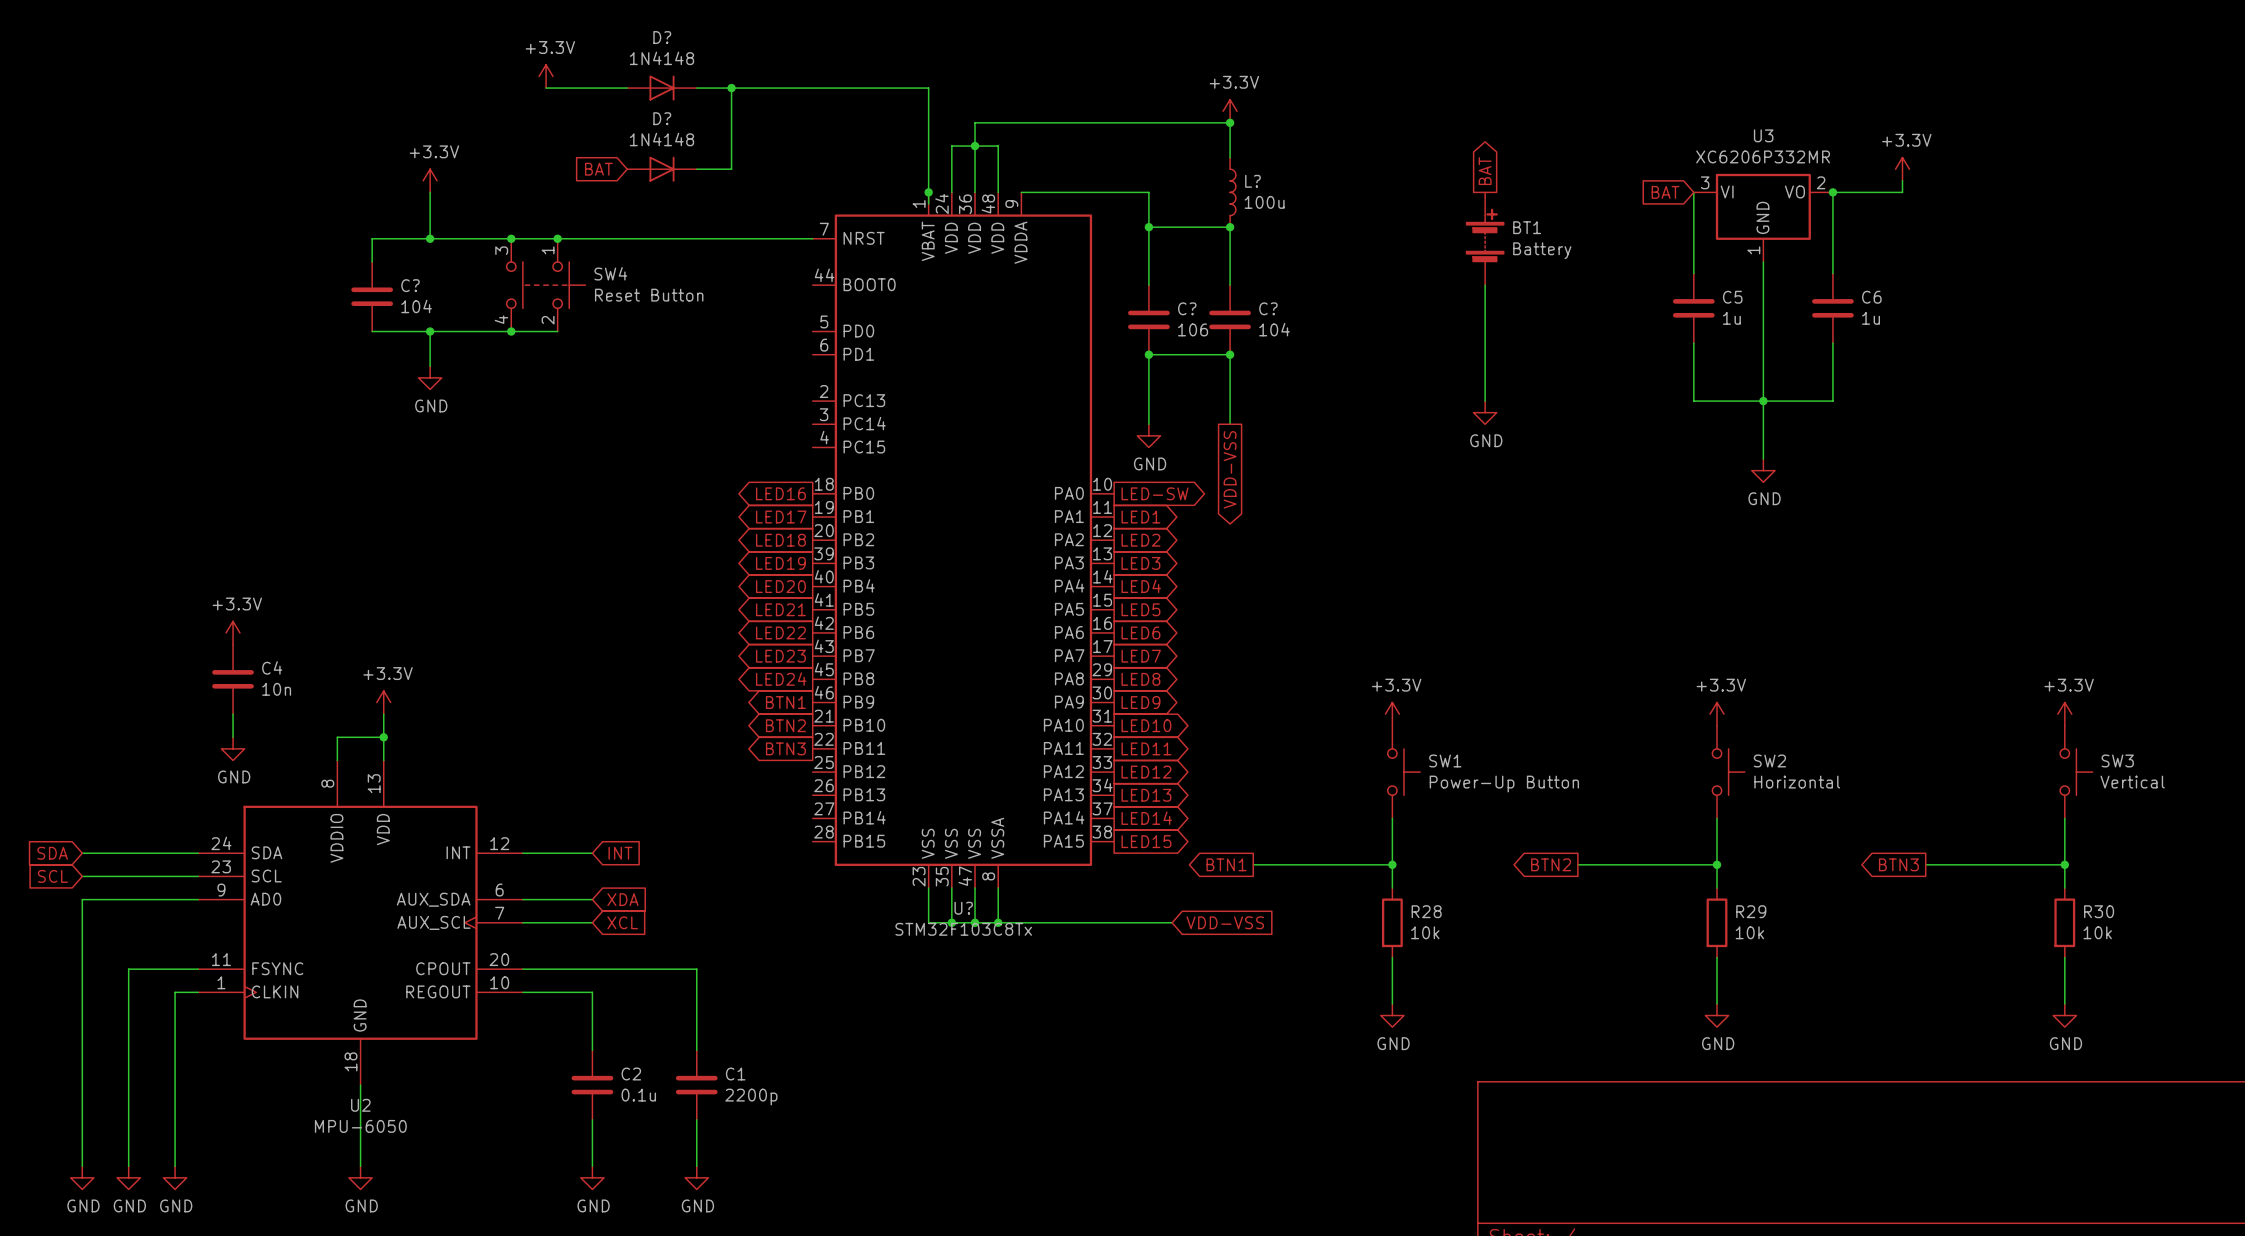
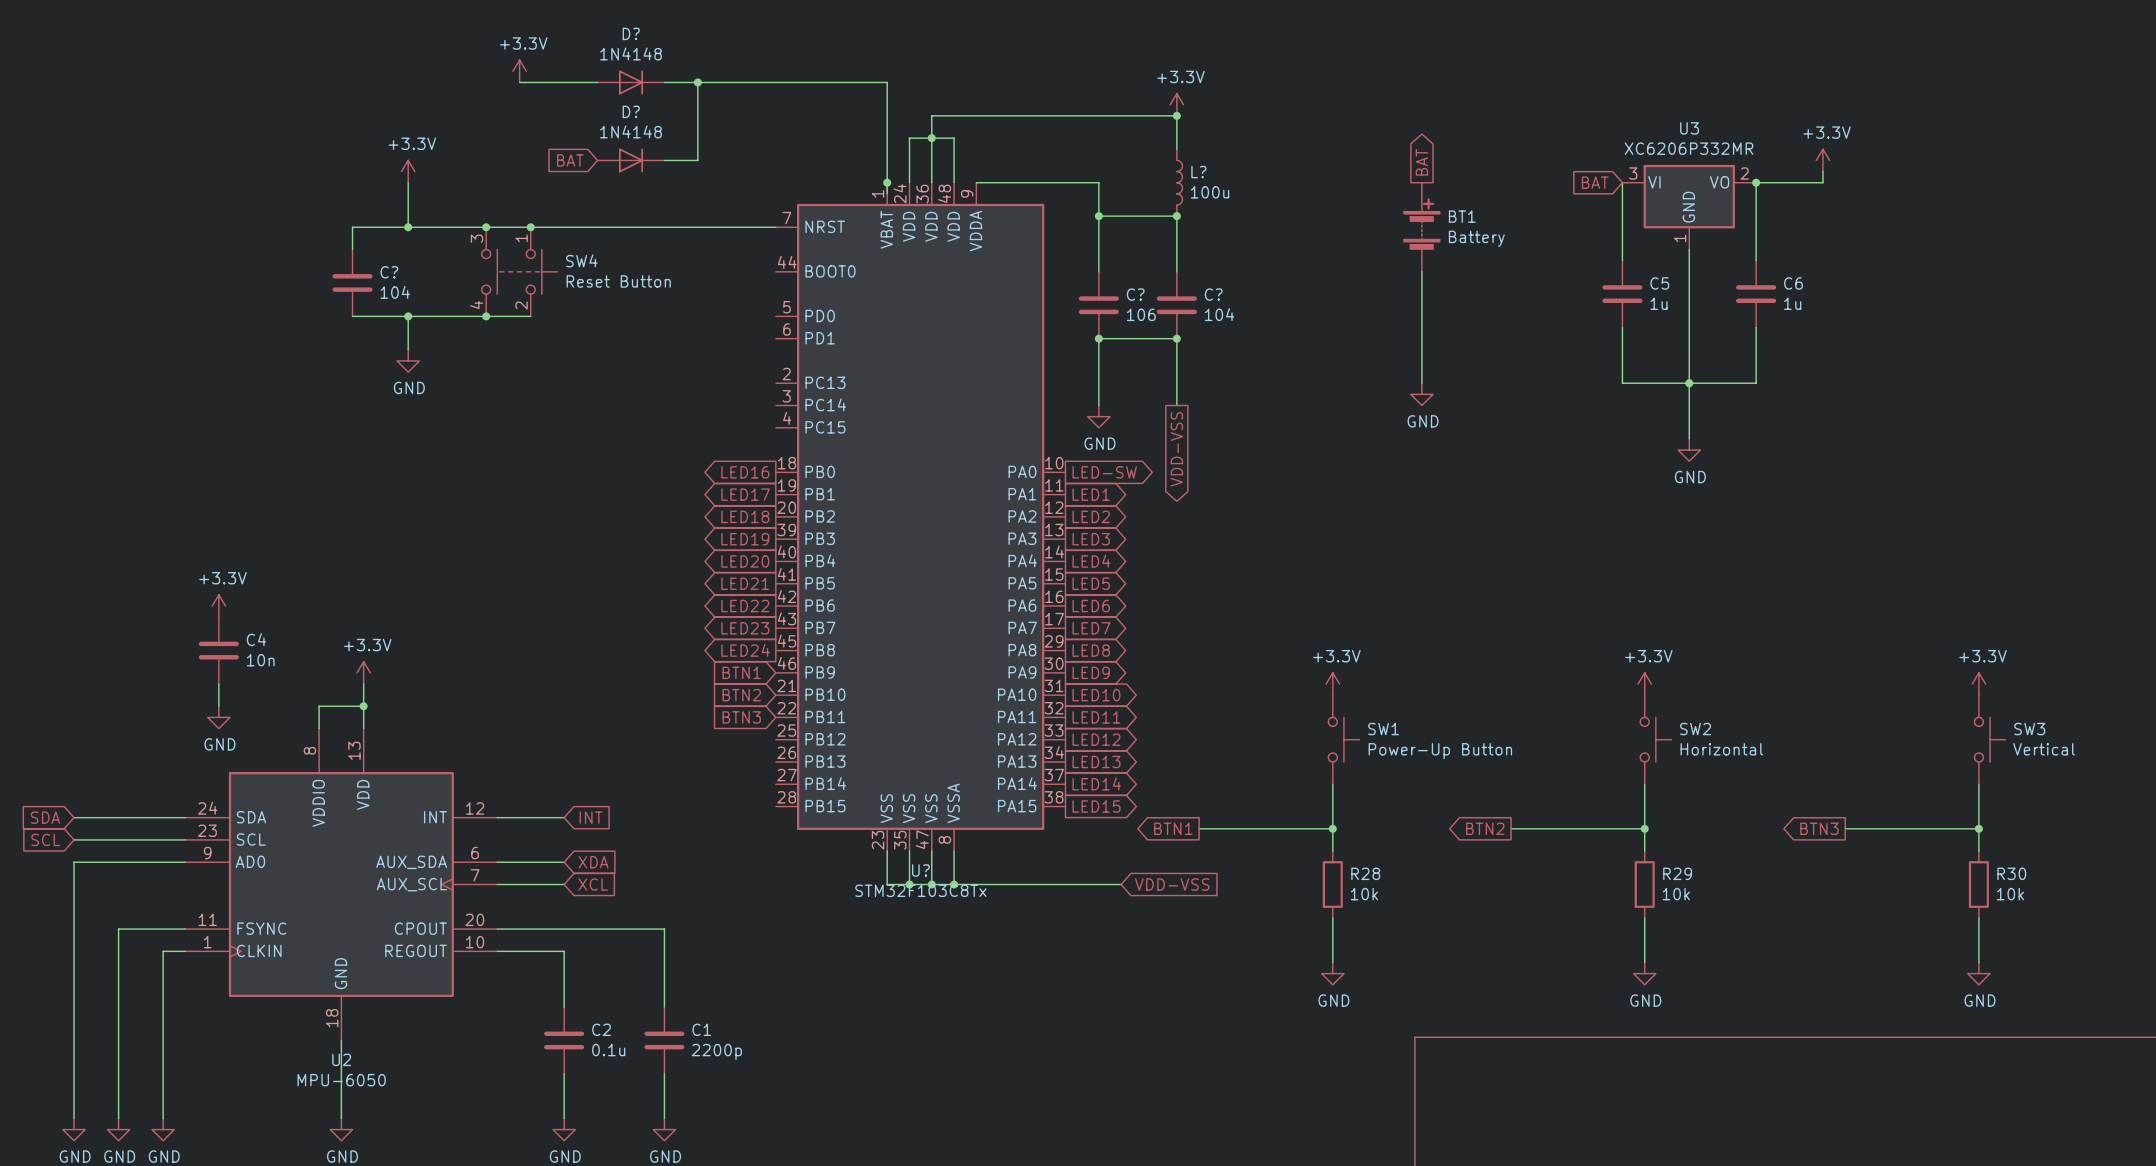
global label shape: output (785, 702) -> input (741, 672)
global label shape: output (785, 725) -> input (741, 695)
global label shape: output (785, 748) -> input (741, 717)

